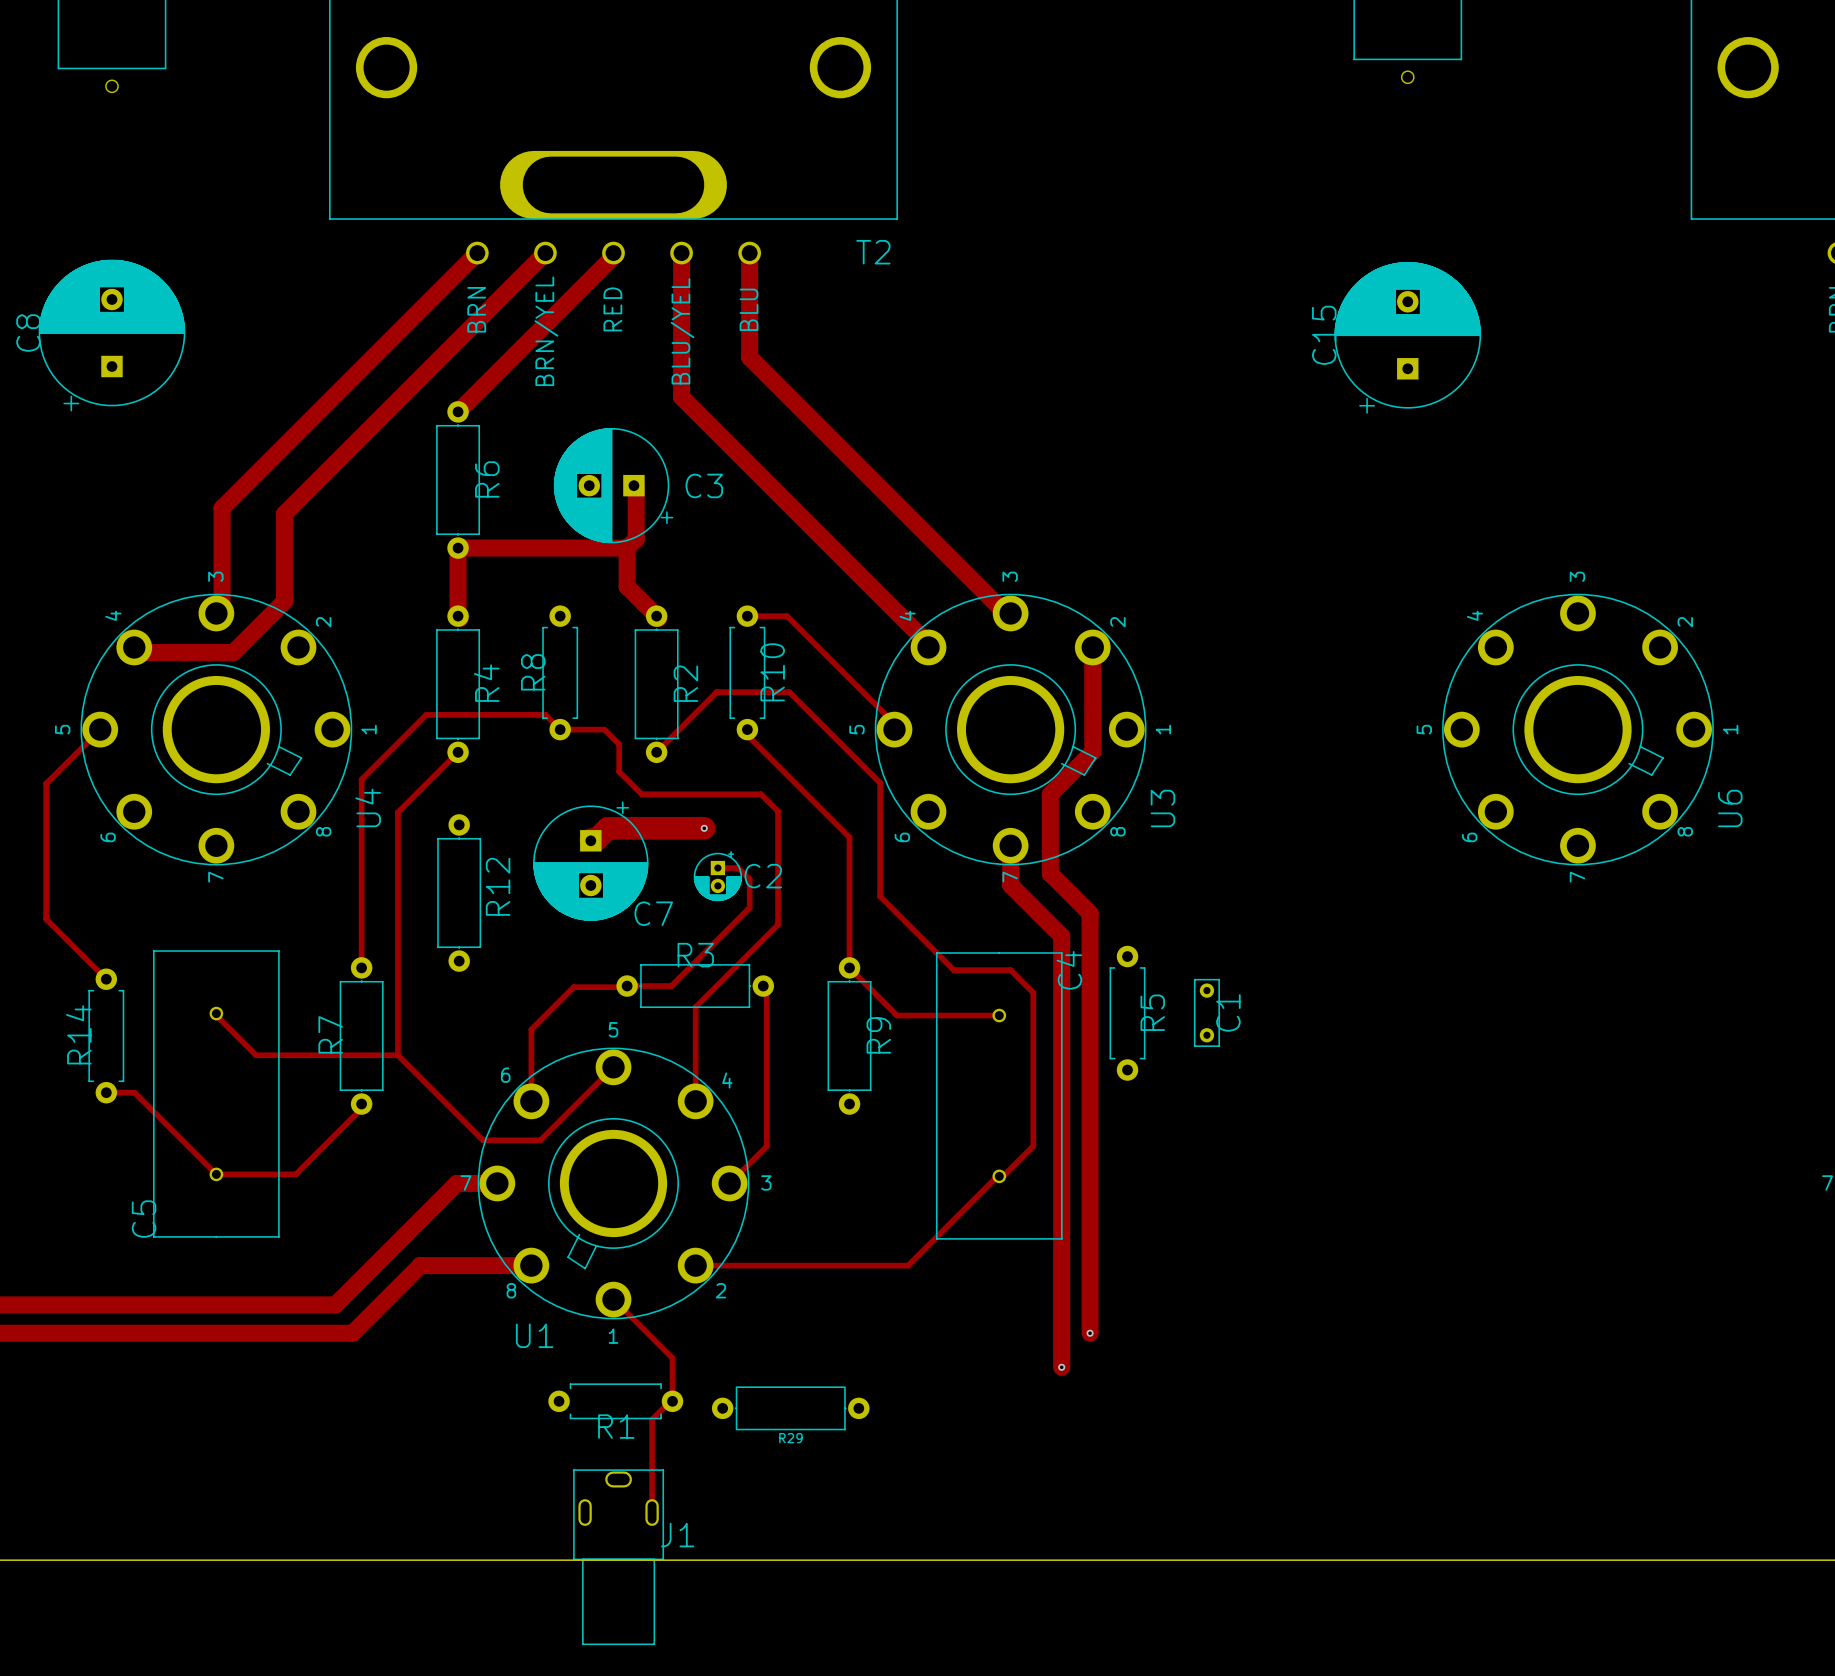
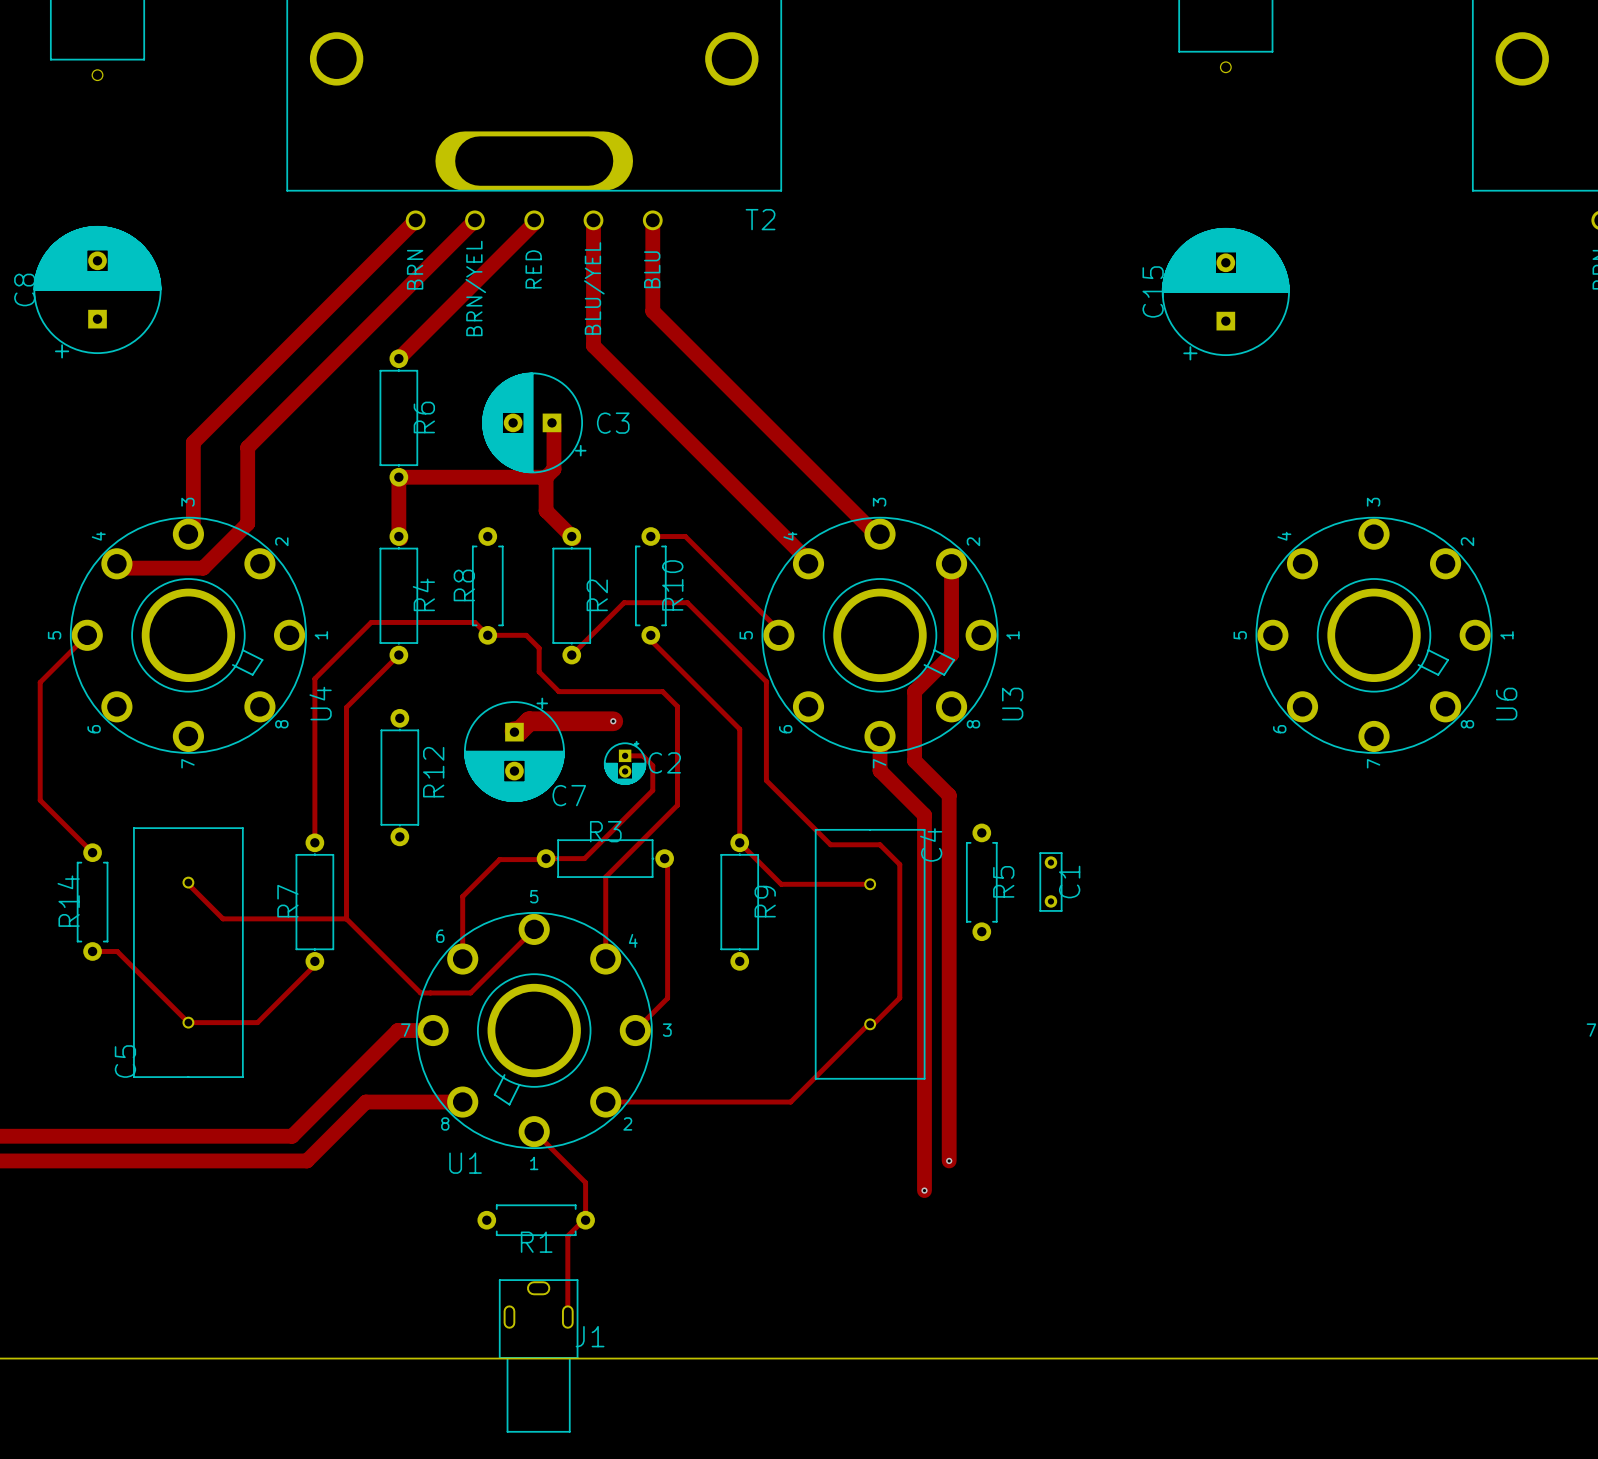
R29: (790, 1408) -> none

